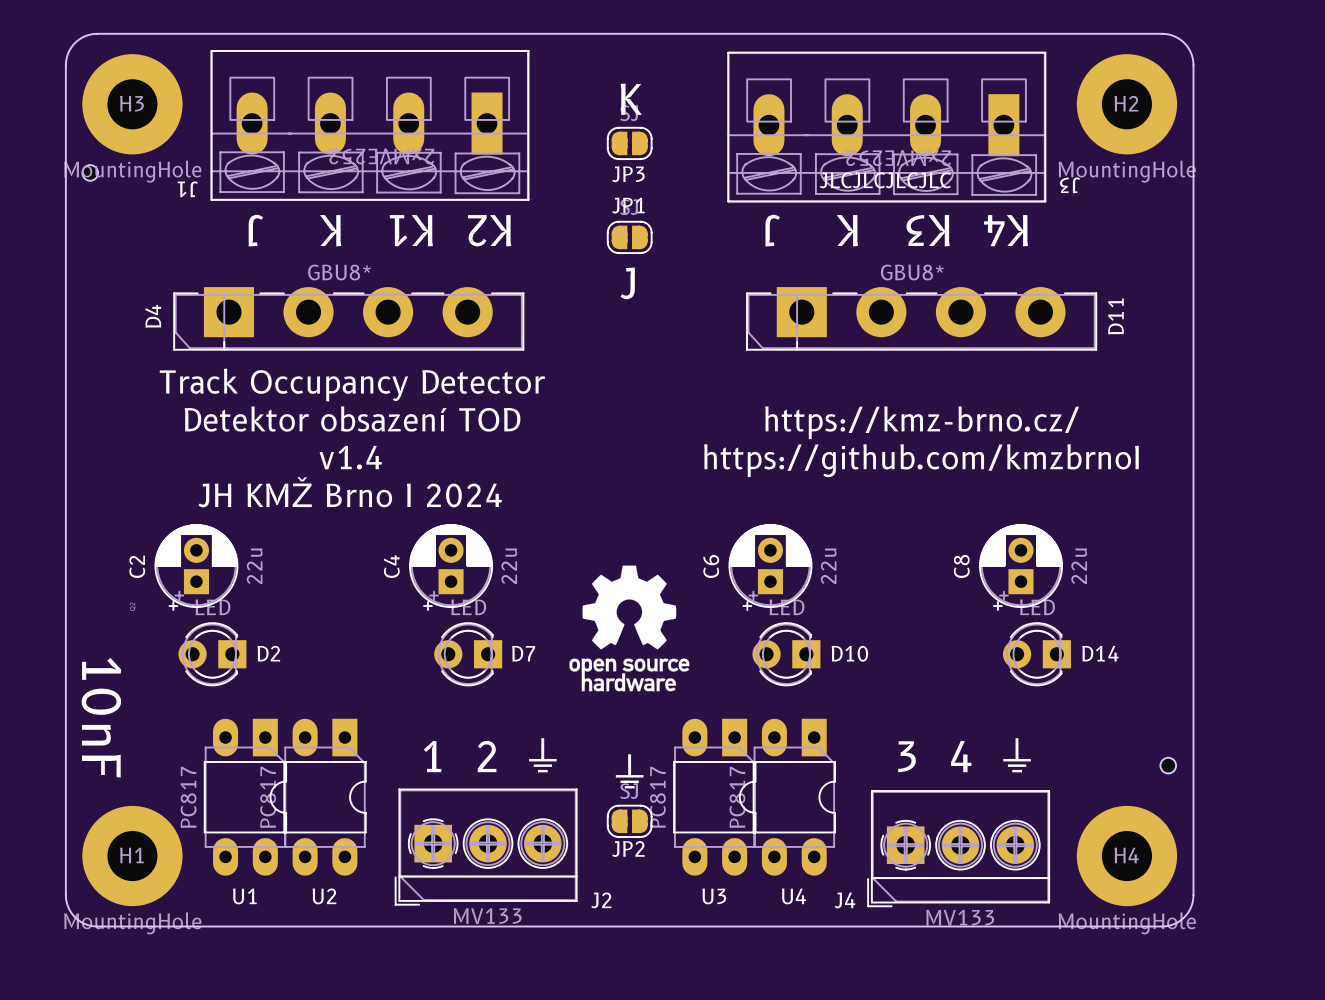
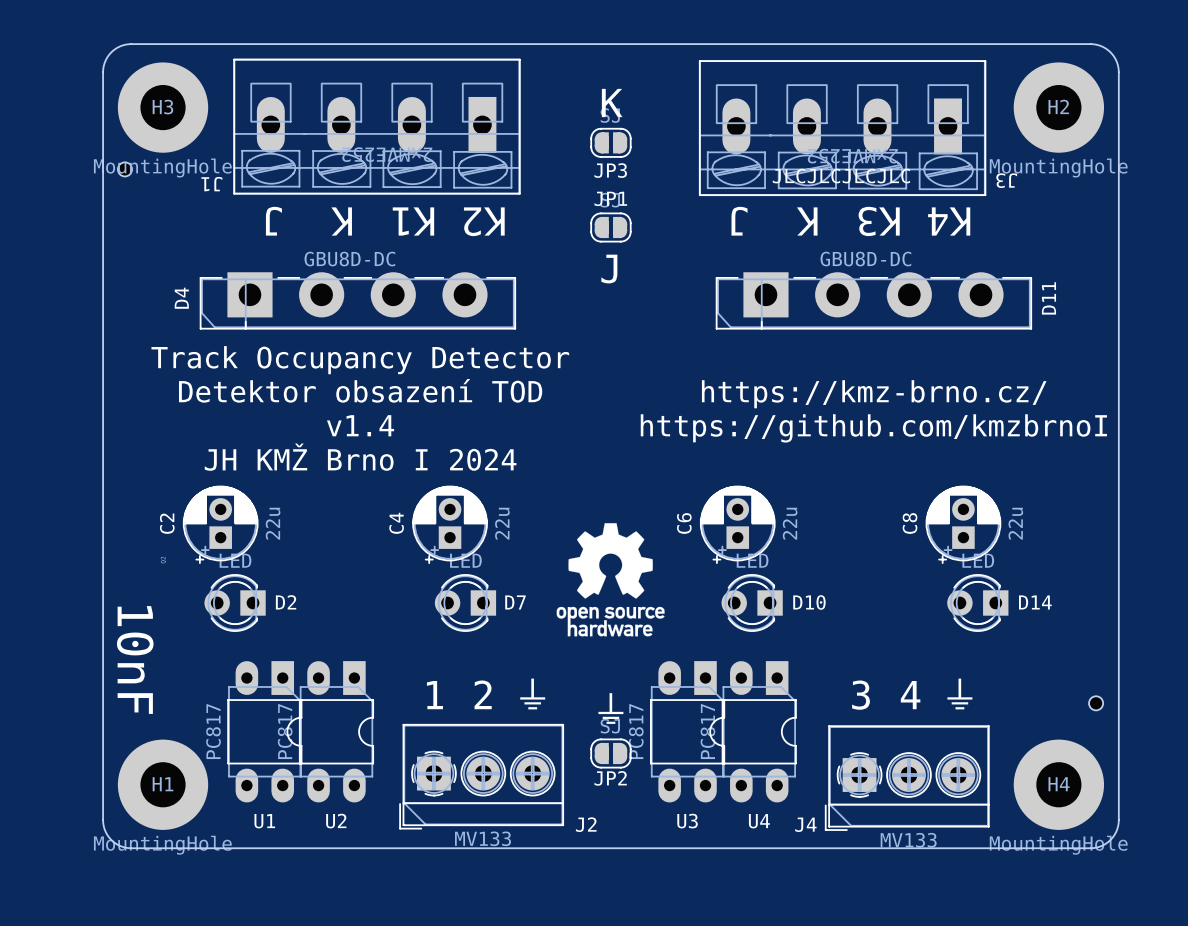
D4 value: GBU8* (339, 272) -> GBU8D-DC (349, 259)
D11 value: GBU8* (912, 272) -> GBU8D-DC (865, 259)

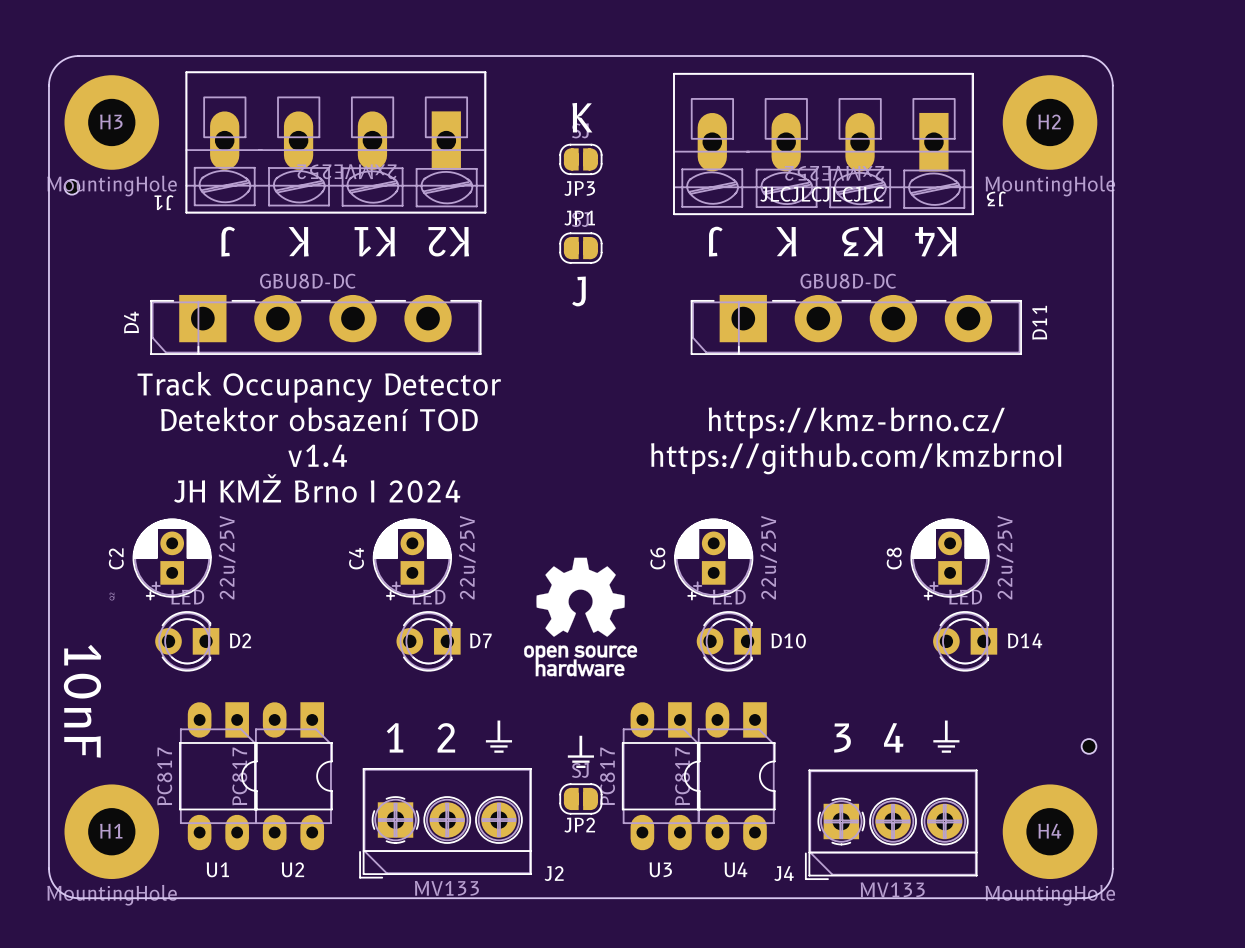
C2 value: 22u (273, 523) -> 22u/25V (227, 557)
C4 value: 22u (502, 523) -> 22u/25V (467, 557)
C6 value: 22u (790, 523) -> 22u/25V (768, 557)
C8 value: 22u (1015, 523) -> 22u/25V (1005, 557)

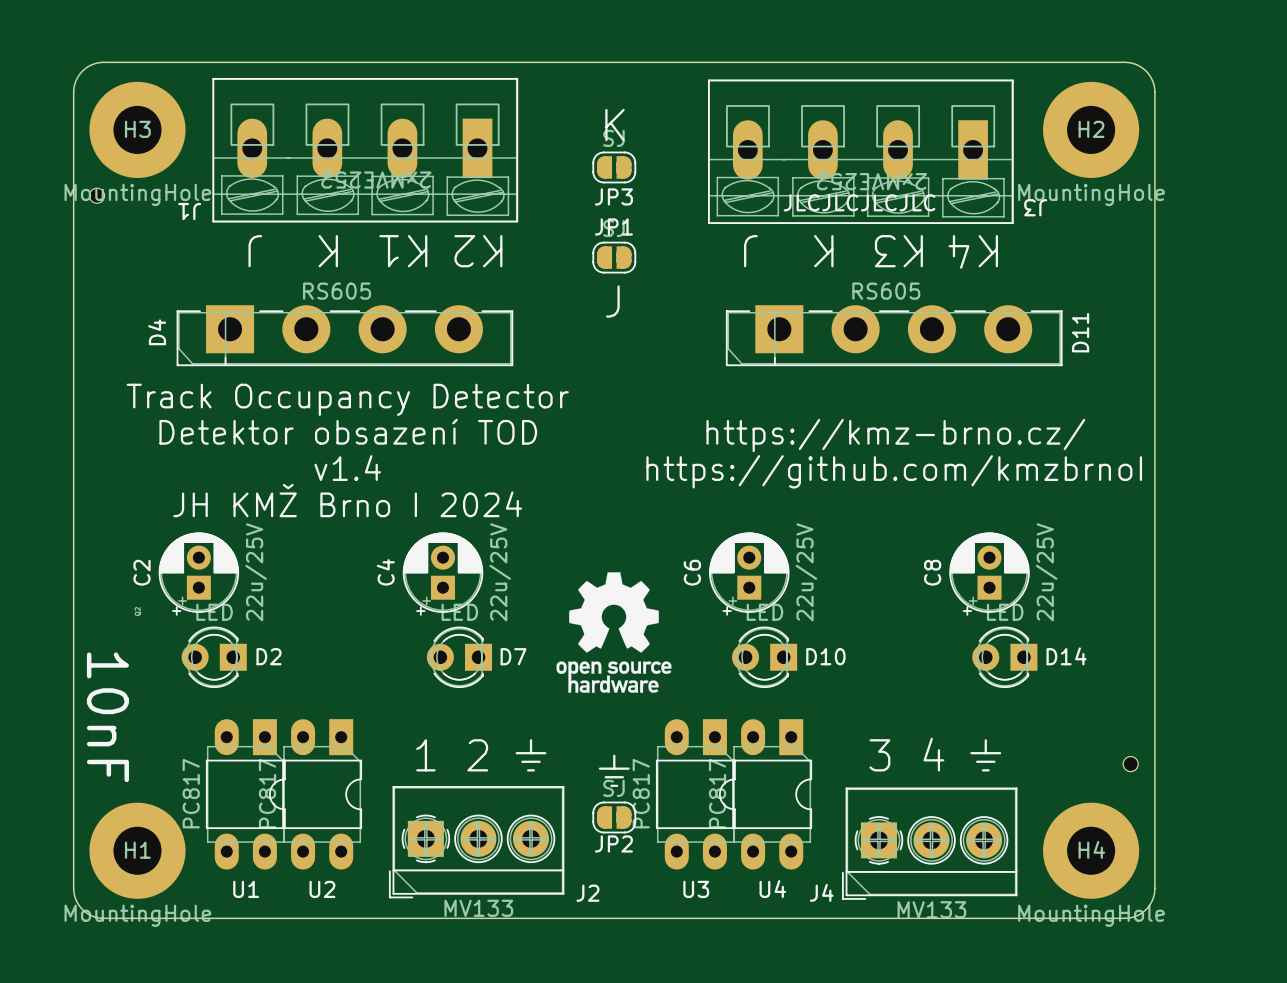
D4 value: GBU8D-DC (307, 281) -> RS605 (337, 291)
D11 value: GBU8D-DC (848, 281) -> RS605 (886, 291)

